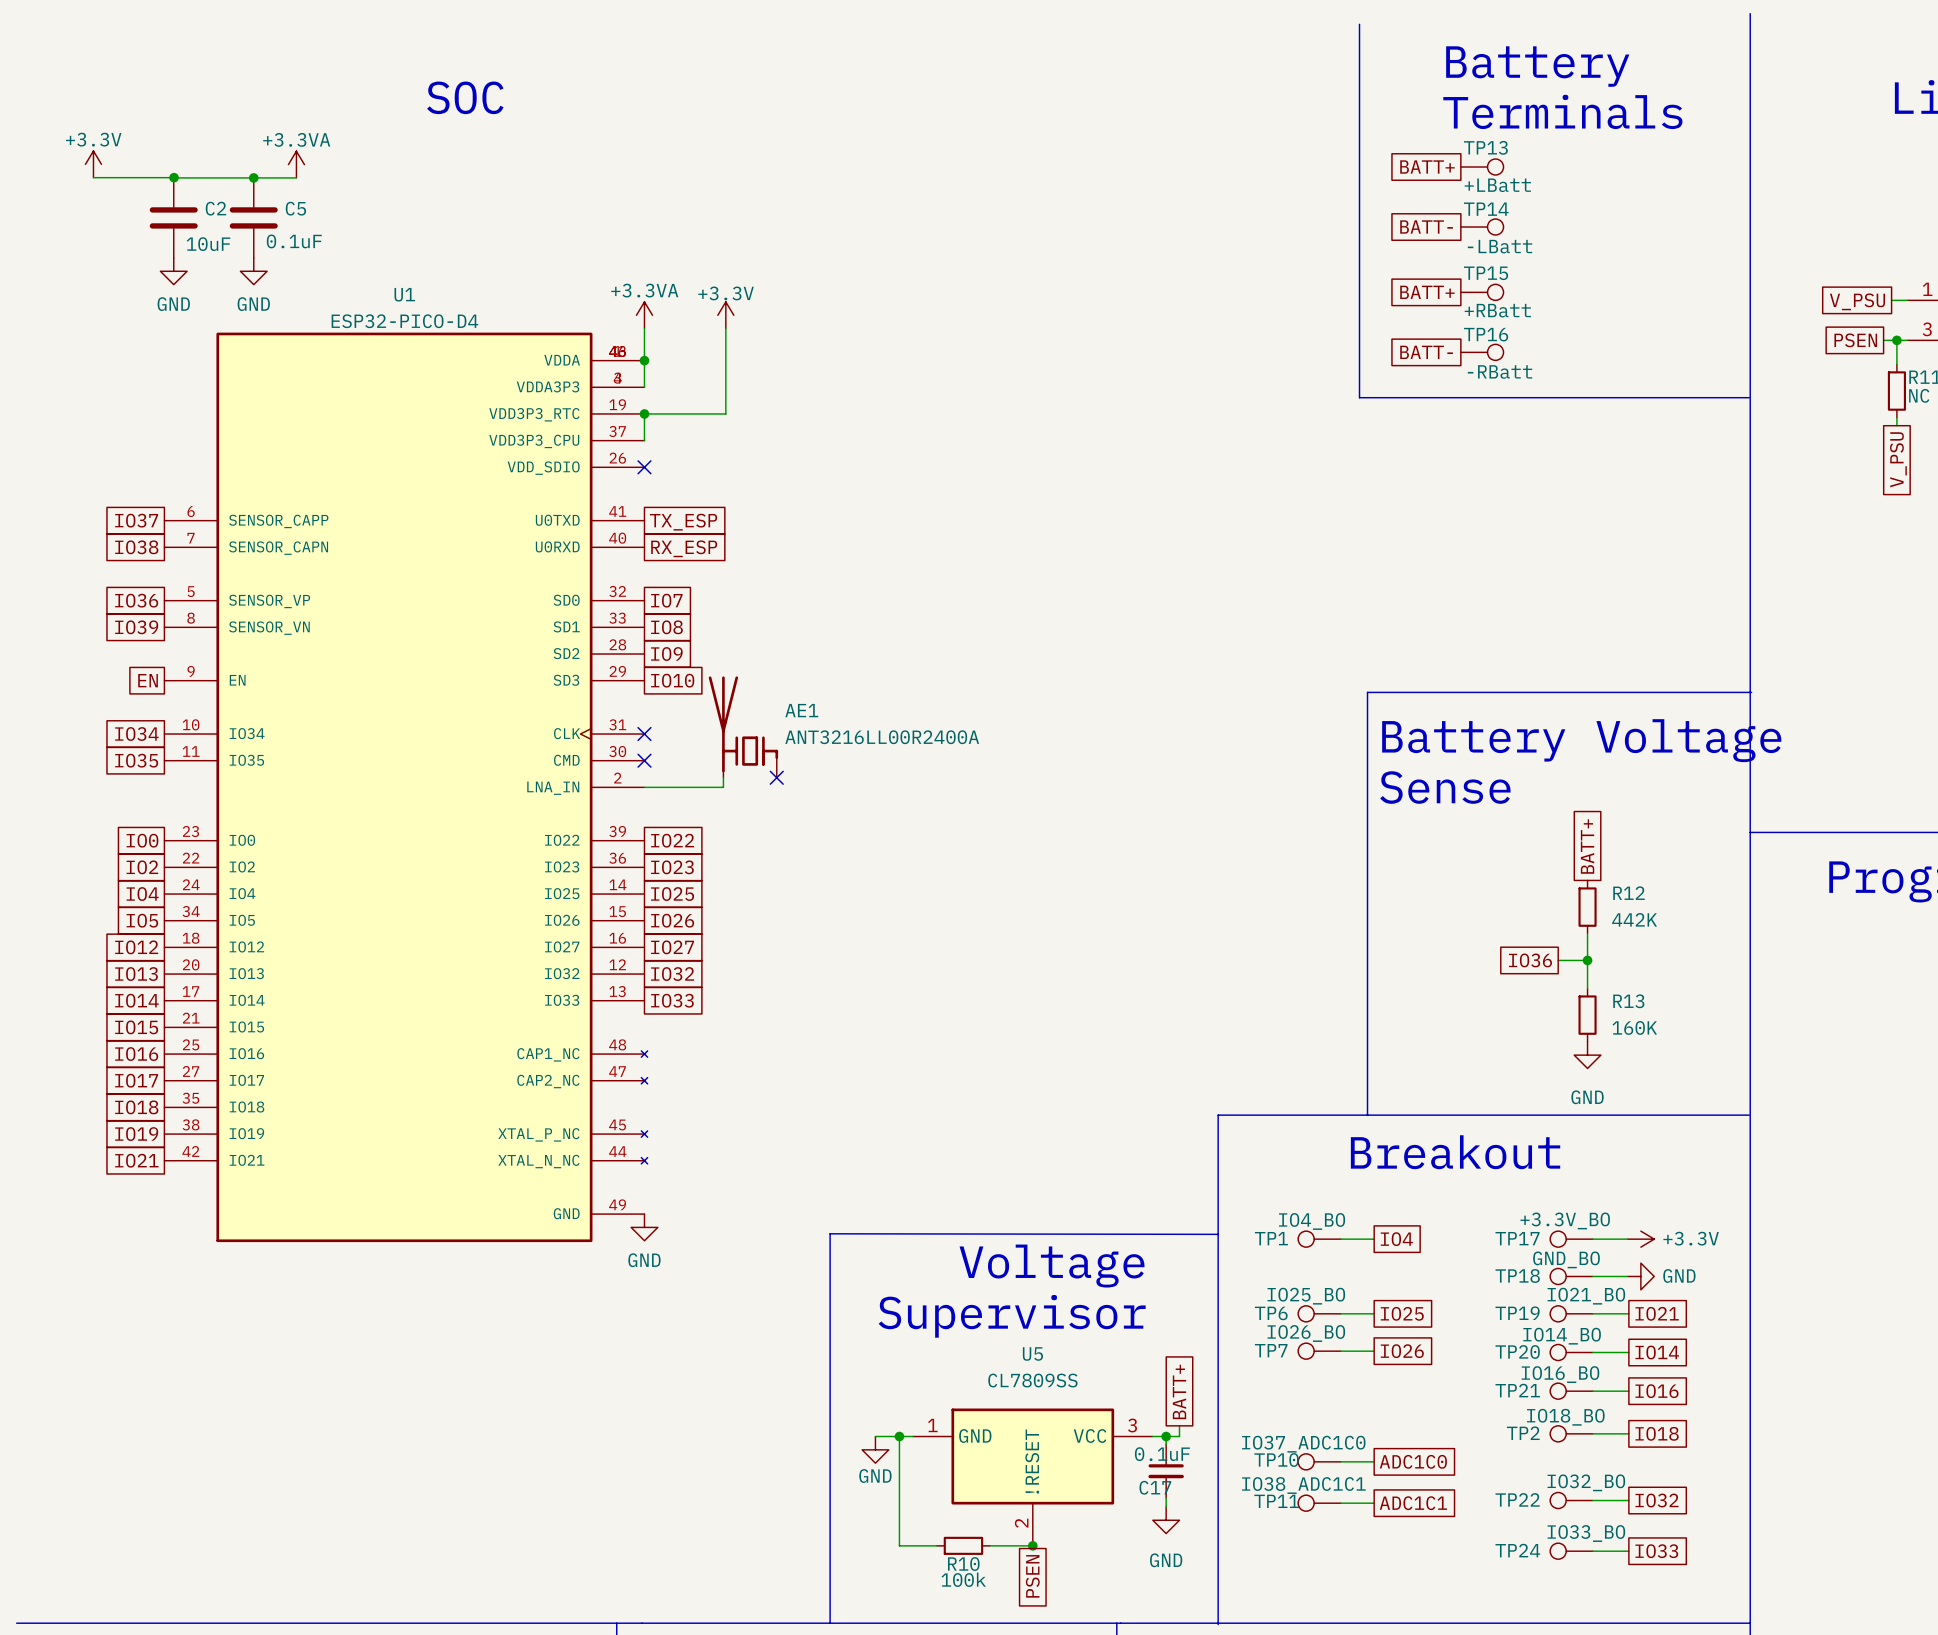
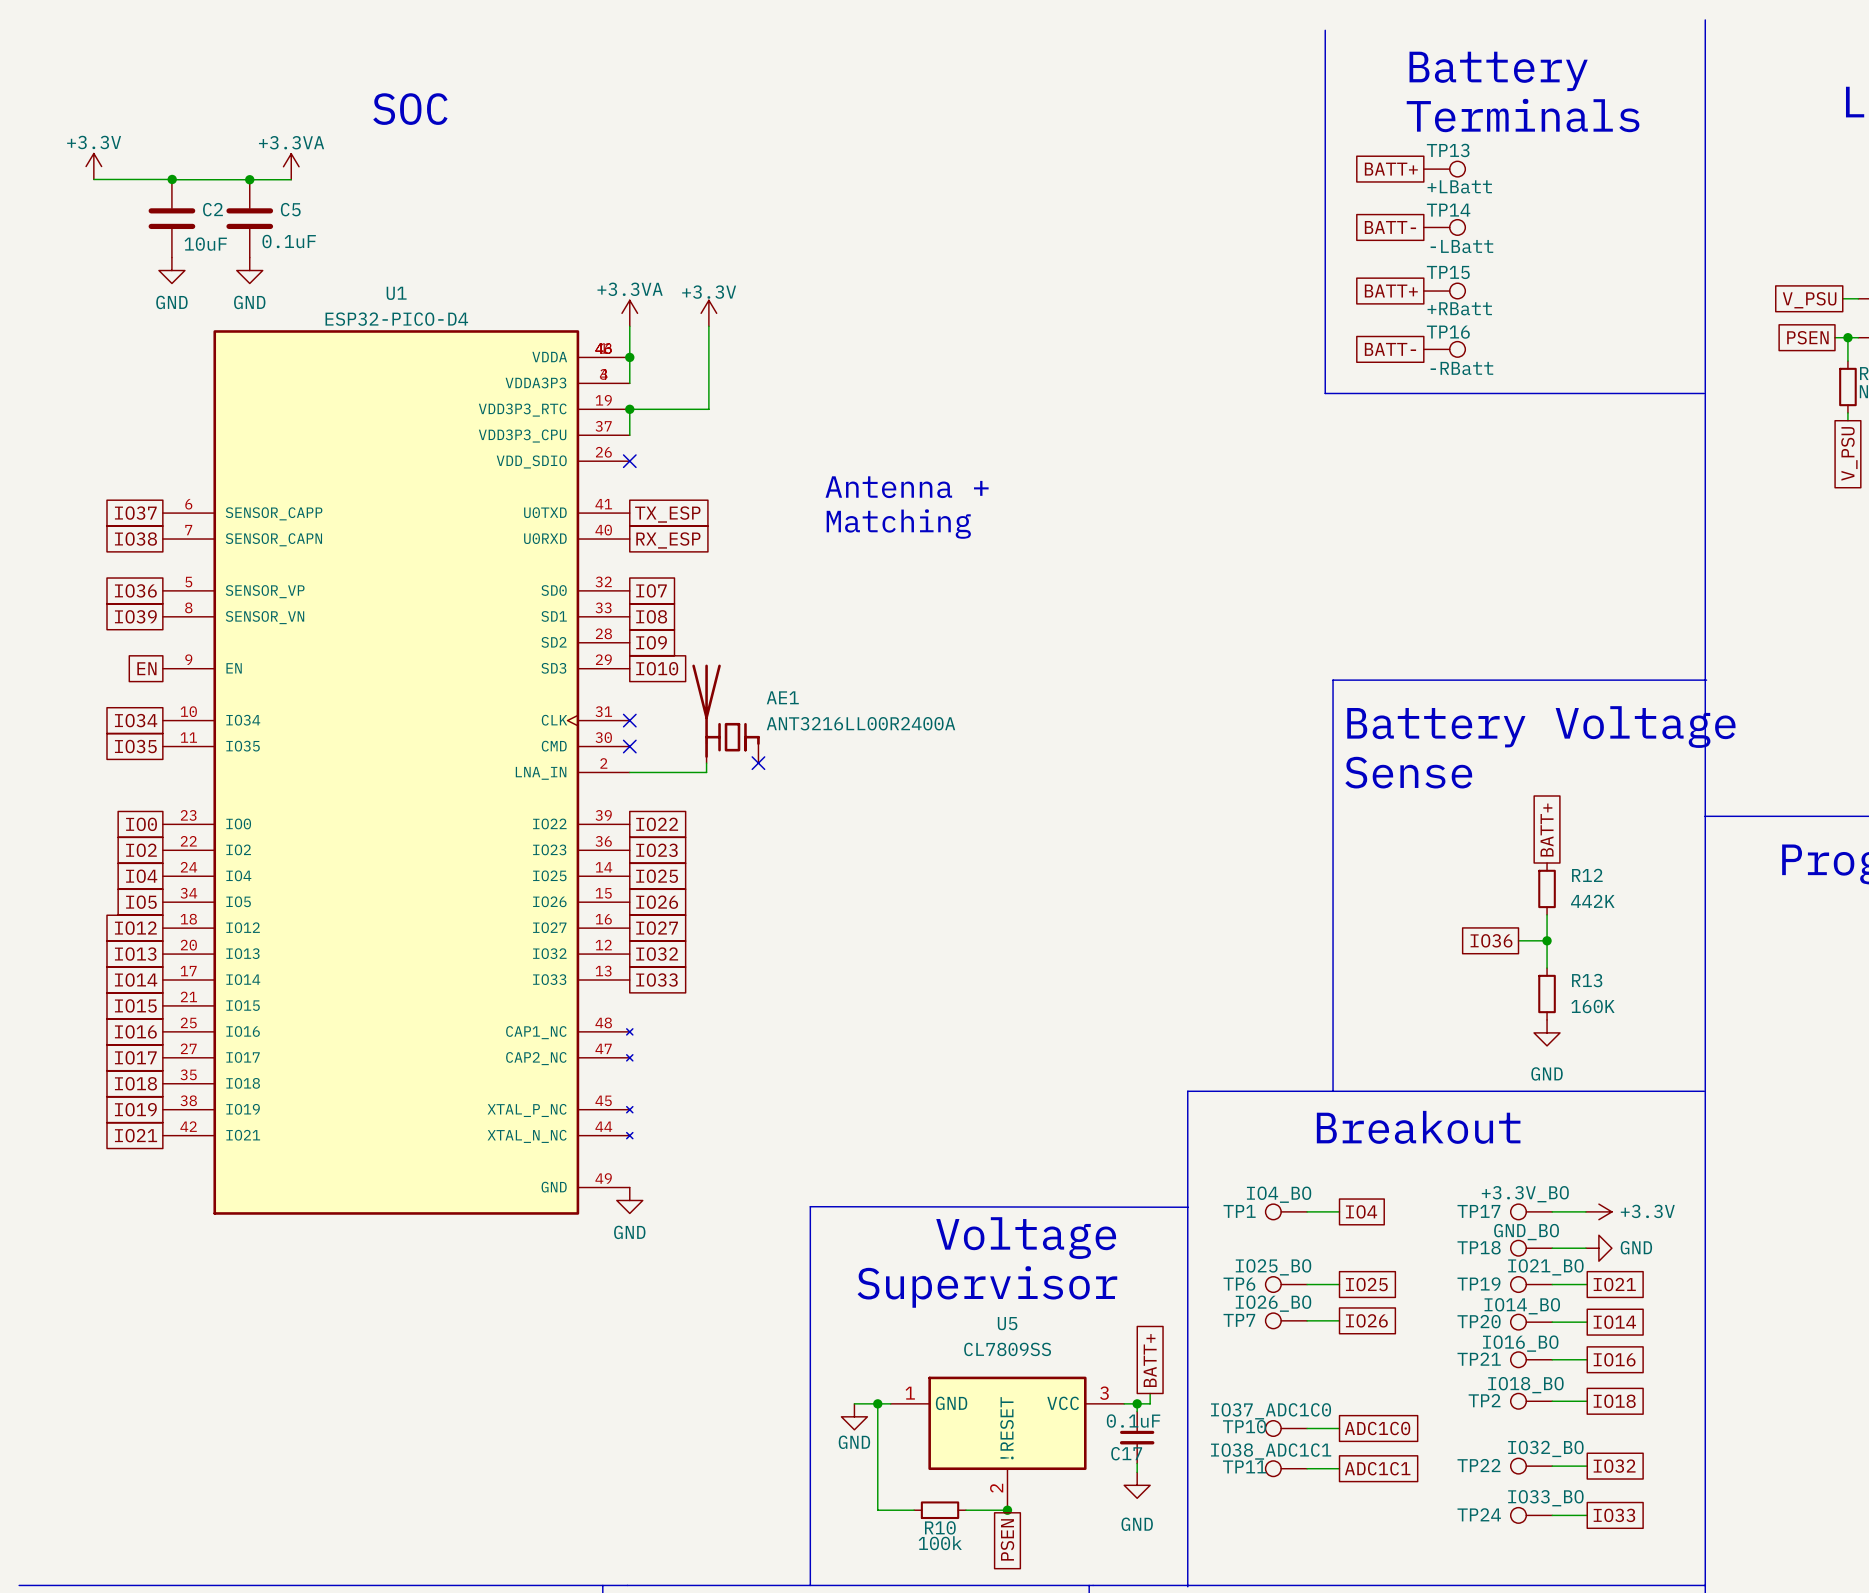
text position: SOC (465, 97) -> SOC (410, 109)
text: none -> Antenna + (907, 487)
text: none -> Matching (898, 524)

